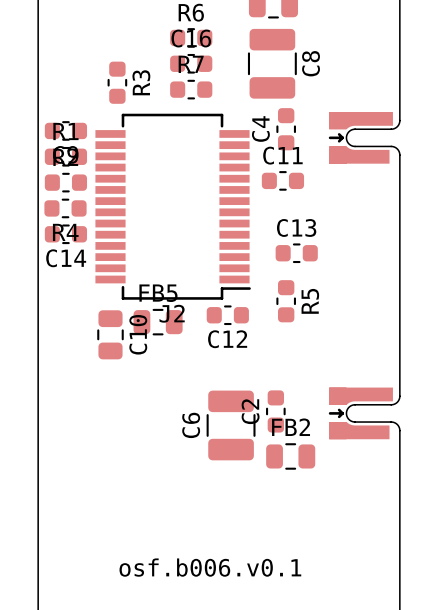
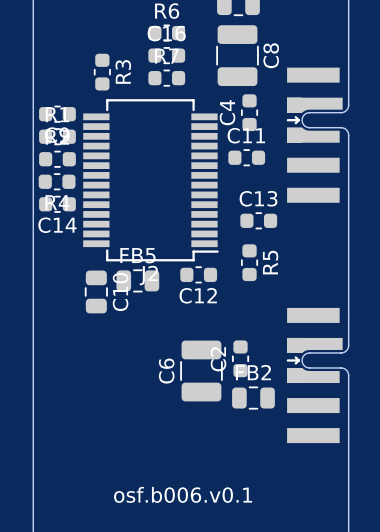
part footprint: [328, 112, 401, 164] -> [286, 67, 350, 203]
part footprint: [328, 387, 401, 440] -> [286, 307, 350, 444]

